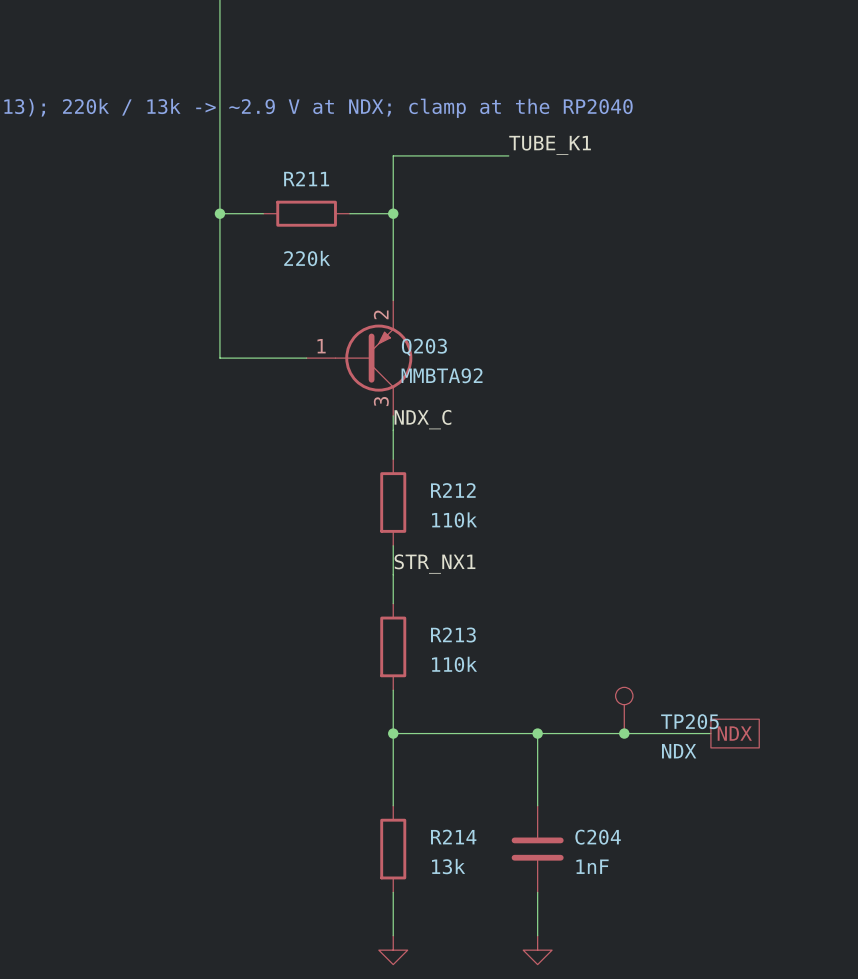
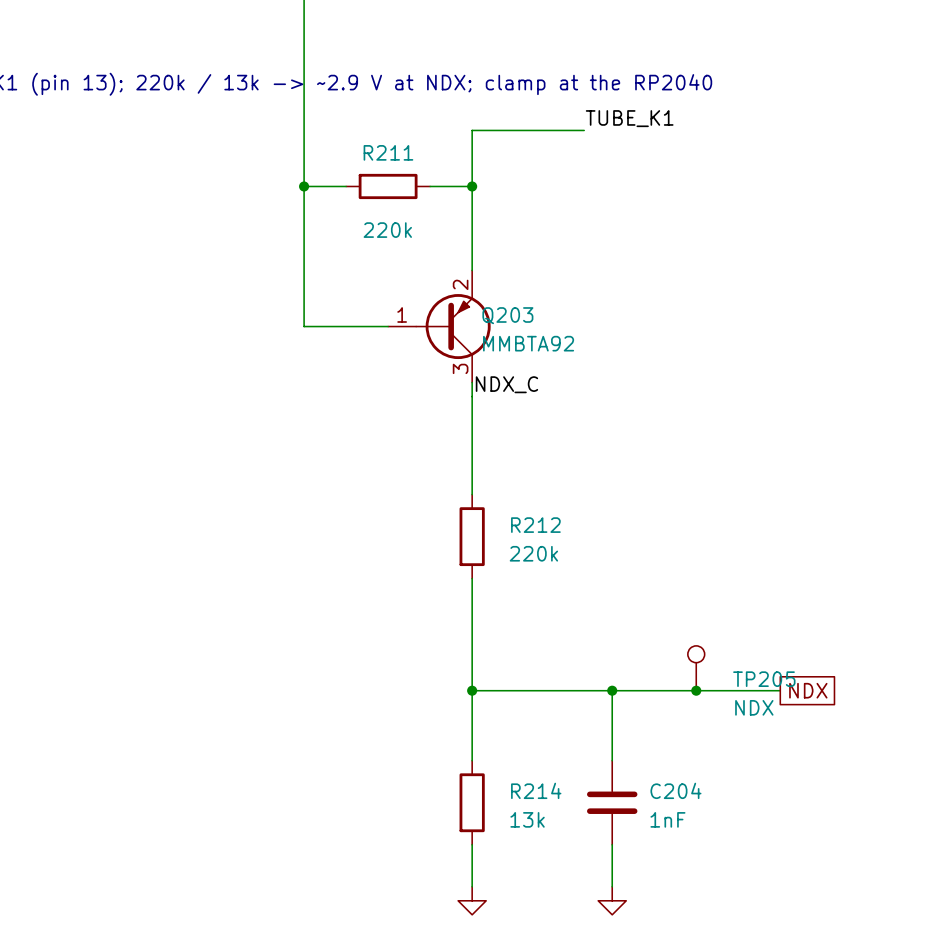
wire: none -> (472, 424) (472, 494)
R212 position: (393, 502) -> (472, 536)
R212 value: 110k (454, 520) -> 220k (533, 553)
wire: (393, 545) (393, 603) -> none
label: STR_NX1 (434, 564) -> none
wire: none -> (472, 578) (472, 648)
R213: 110k (393, 646) -> none

